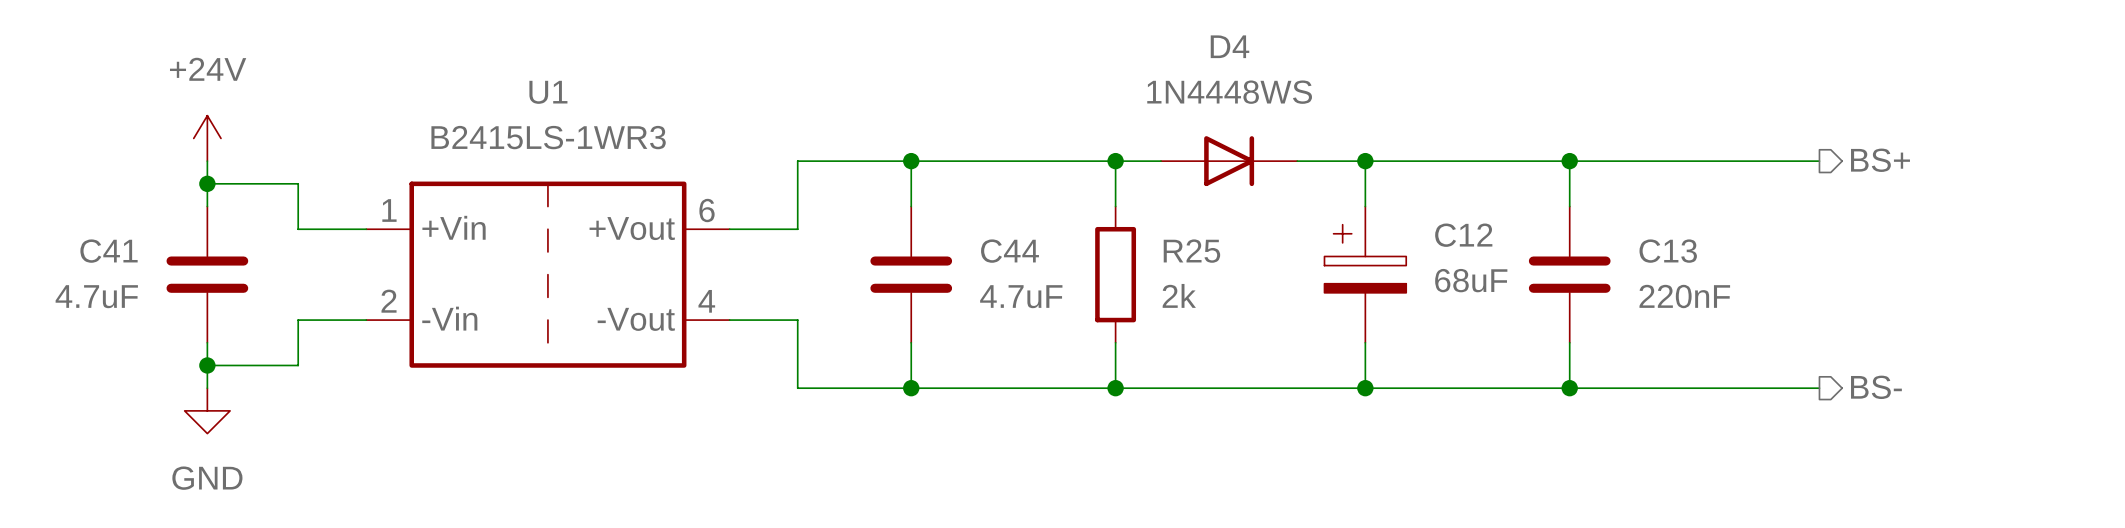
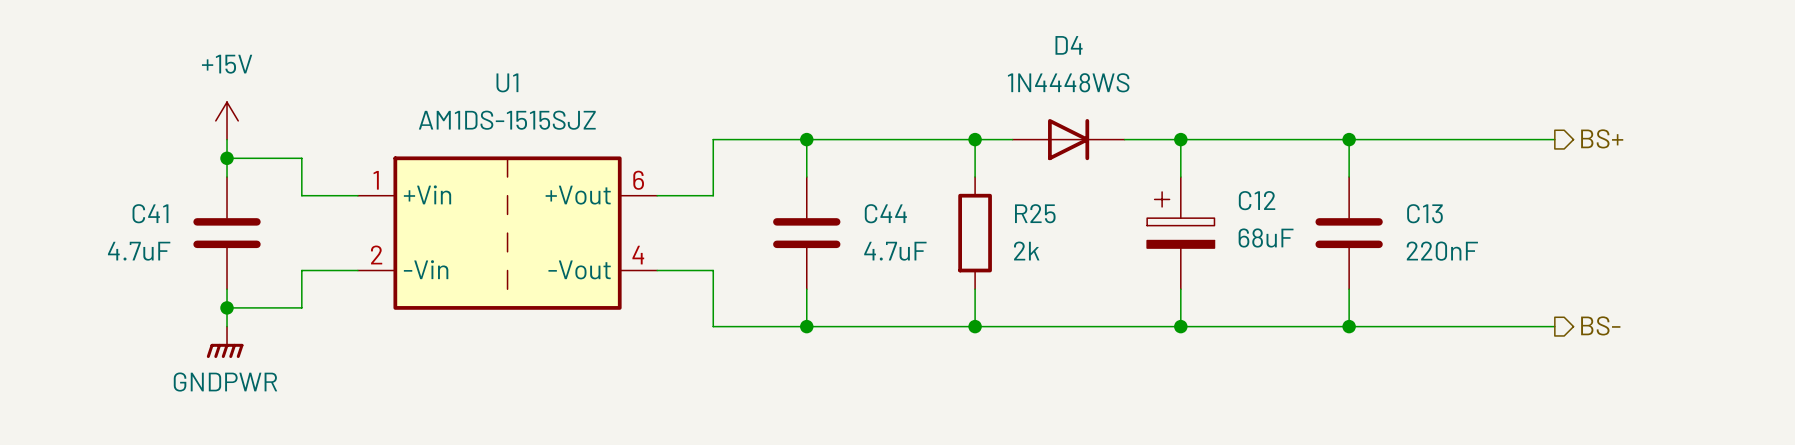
U1 value: B2415LS-1WR3 (548, 137) -> AM1DS-1515SJZ (507, 120)
power symbol: +24V (207, 138) -> +15V (227, 120)
power symbol: GND (207, 410) -> GNDPWR (225, 342)

